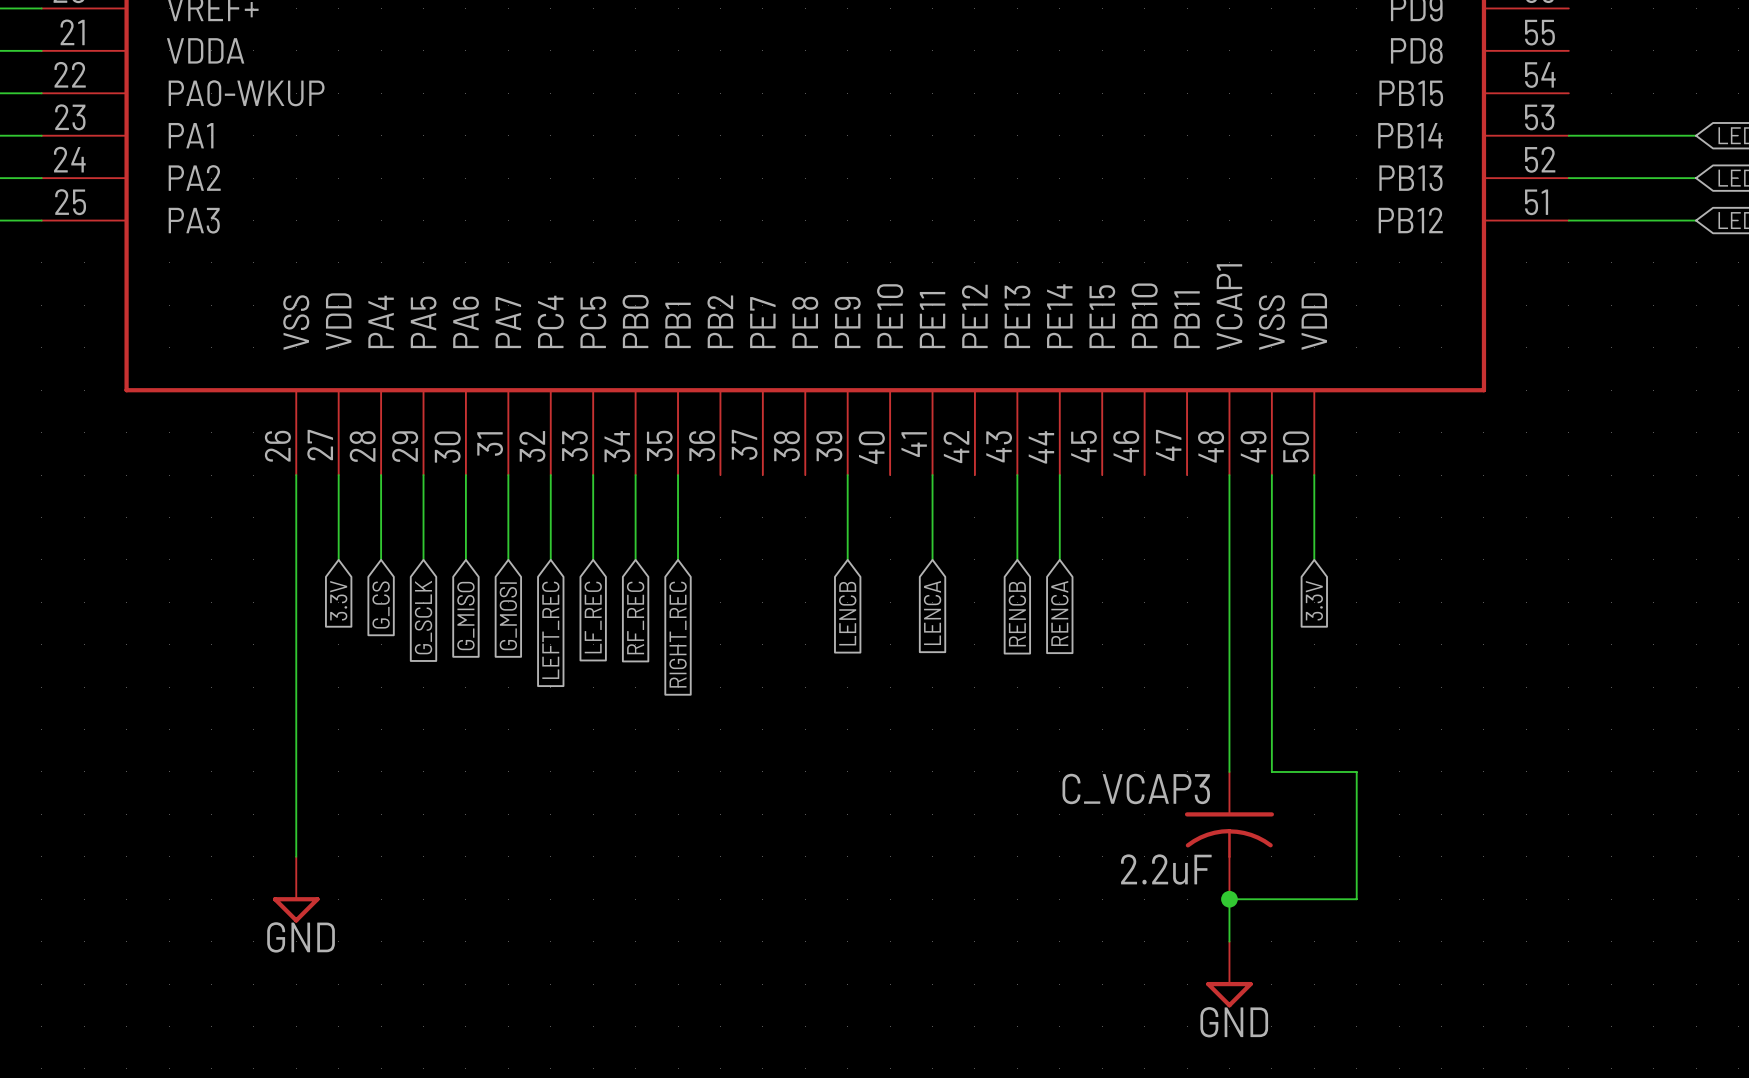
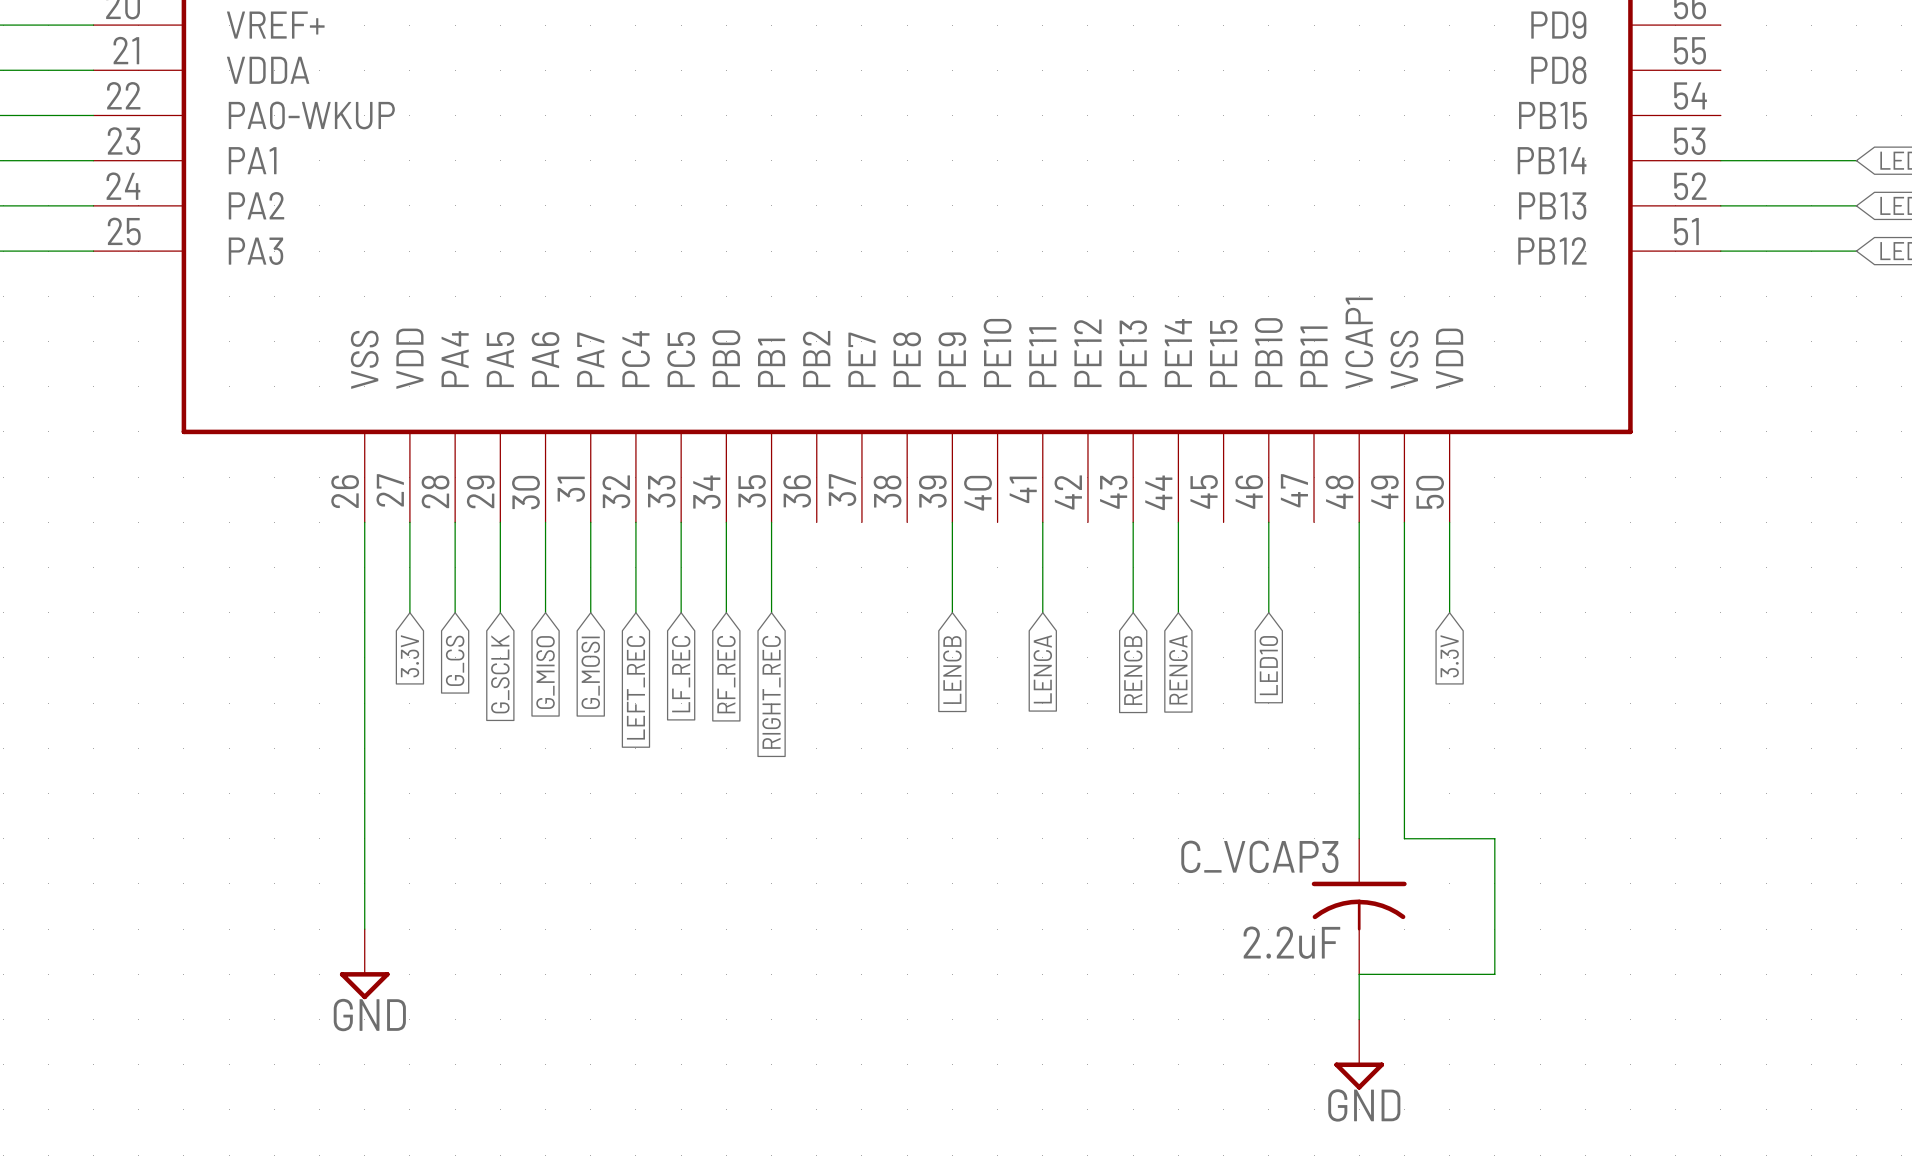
wire: none -> (1268, 522) (1268, 612)
global label: none -> LED10 (1268, 665)
junction: (1229, 899) -> none

